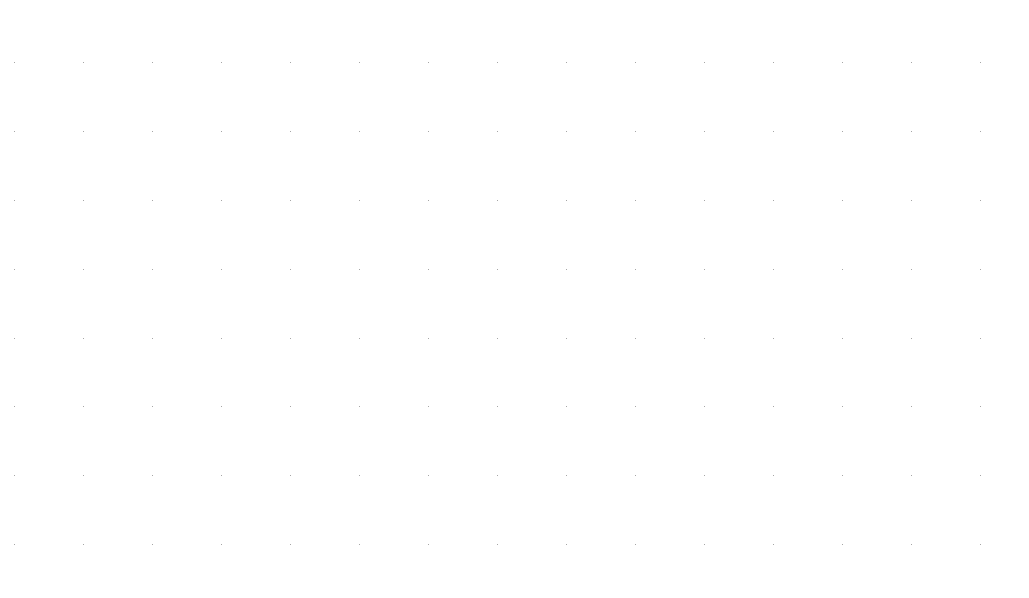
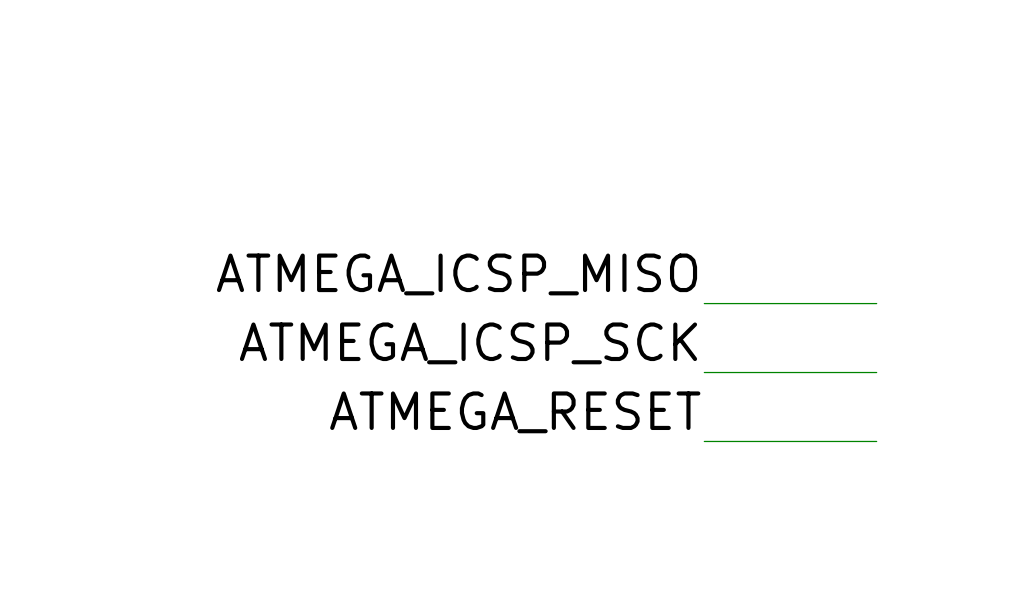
label: none -> ATMEGA_ICSP_MISO (457, 274)
wire: none -> (704, 303) (876, 303)
label: none -> ATMEGA_ICSP_SCK (468, 343)
wire: none -> (704, 372) (876, 372)
label: none -> ATMEGA_RESET (515, 412)
wire: none -> (704, 441) (876, 441)

